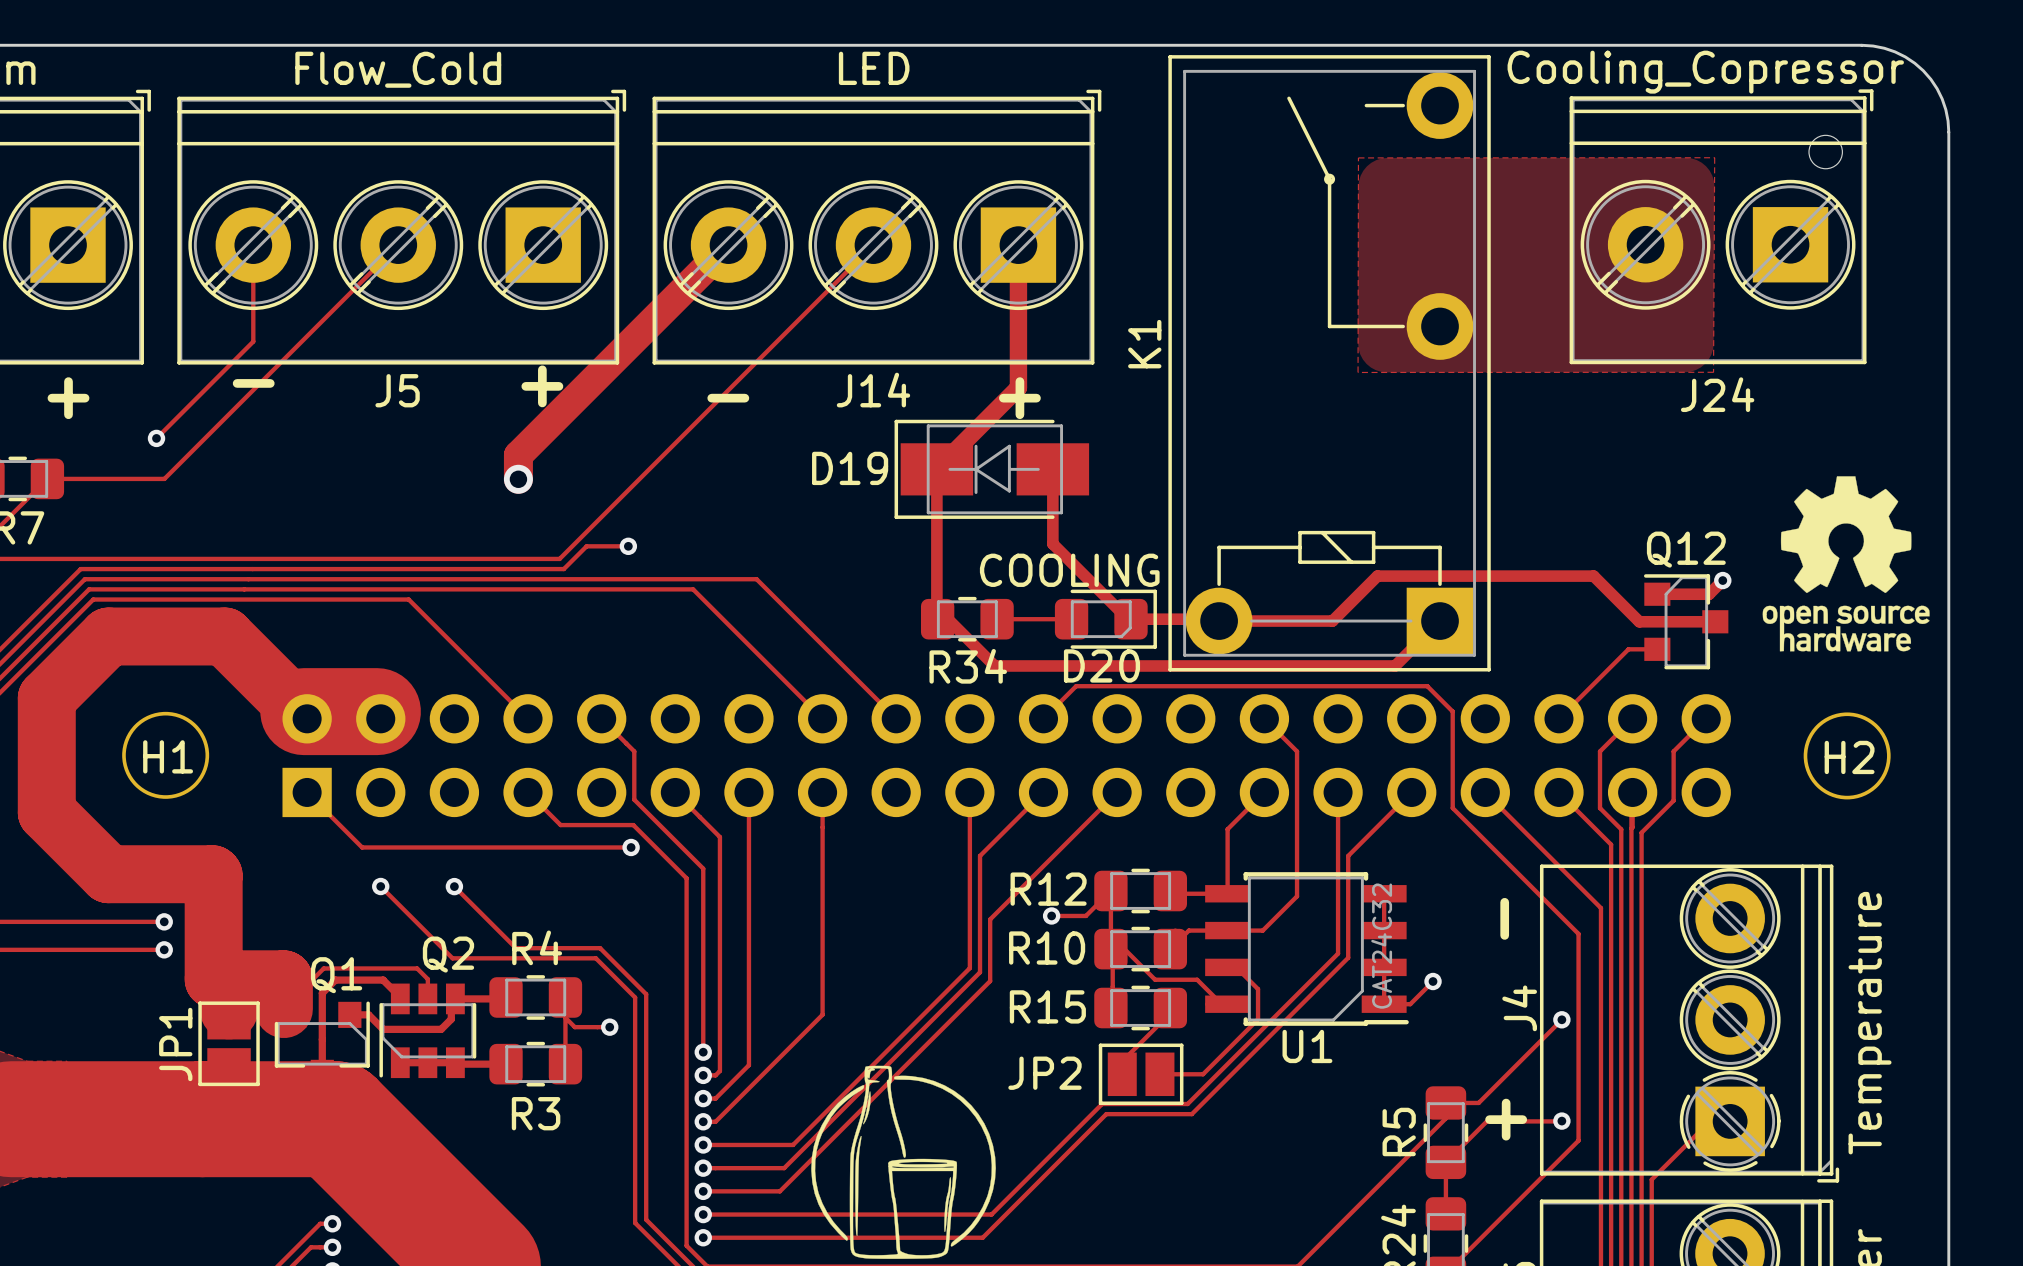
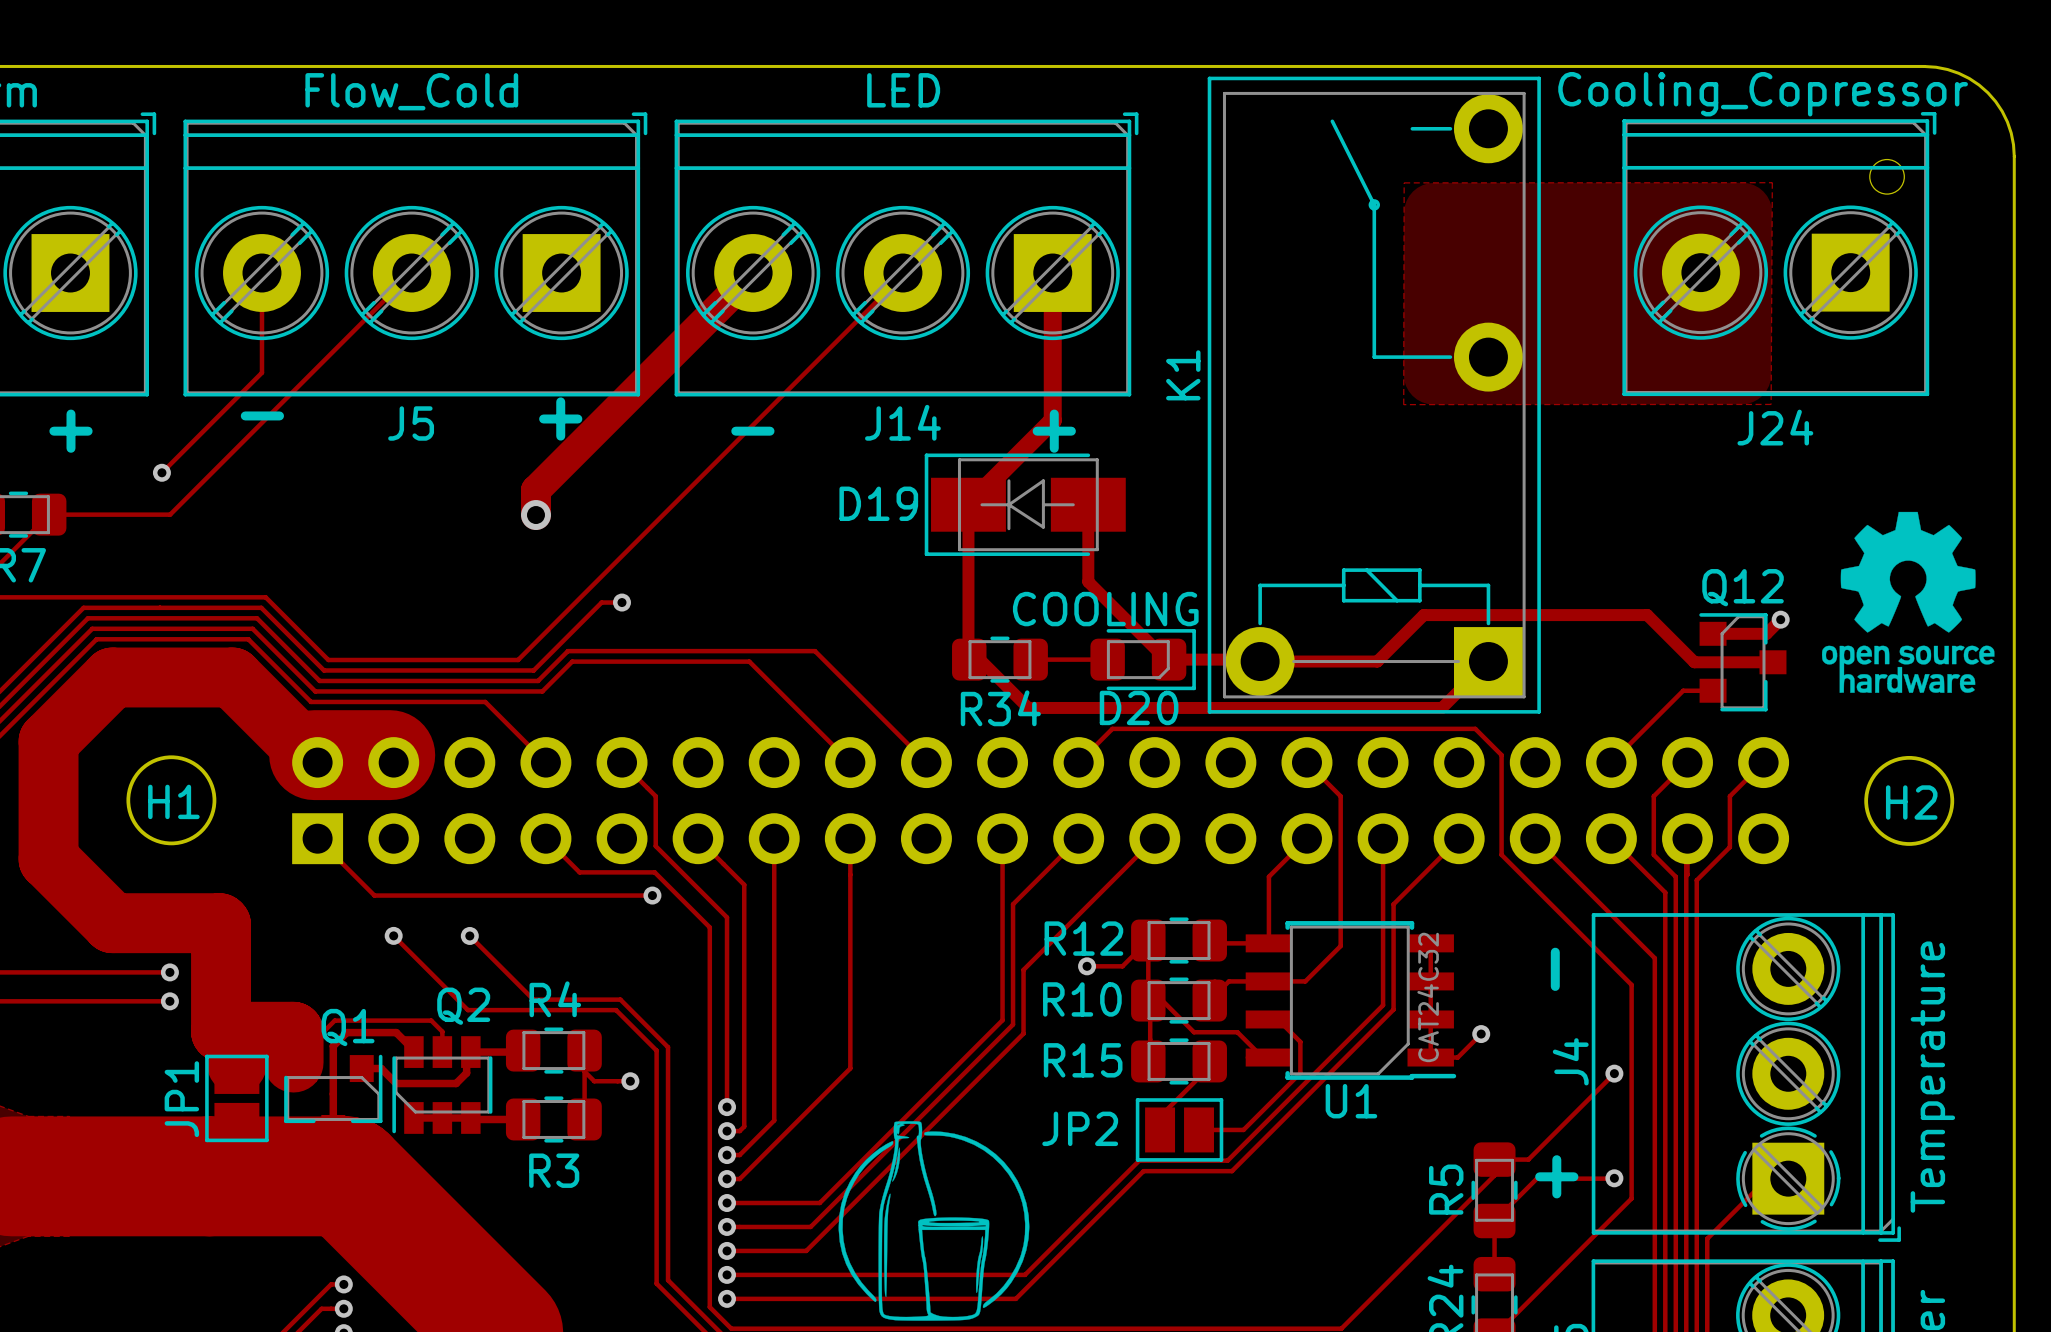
track: (873, 245) (559, 558) (256, 558) -> (902, 275) (518, 660) (328, 660) (265, 597)
track: (628, 546) (586, 546) (563, 569) (252, 569) -> (621, 602) (601, 602) (533, 670) (324, 670) (261, 607)
via position: (628, 546) -> (621, 602)
track: (248, 579) (756, 579) (788, 610) -> (257, 618) (319, 680) (538, 680) (567, 651) (814, 651)
track: (244, 589) (693, 589) (724, 621) -> (252, 628) (315, 691) (542, 691) (572, 661) (749, 661)
track: (240, 599) (408, 599) (469, 660) -> (248, 639) (311, 701) (485, 701)

